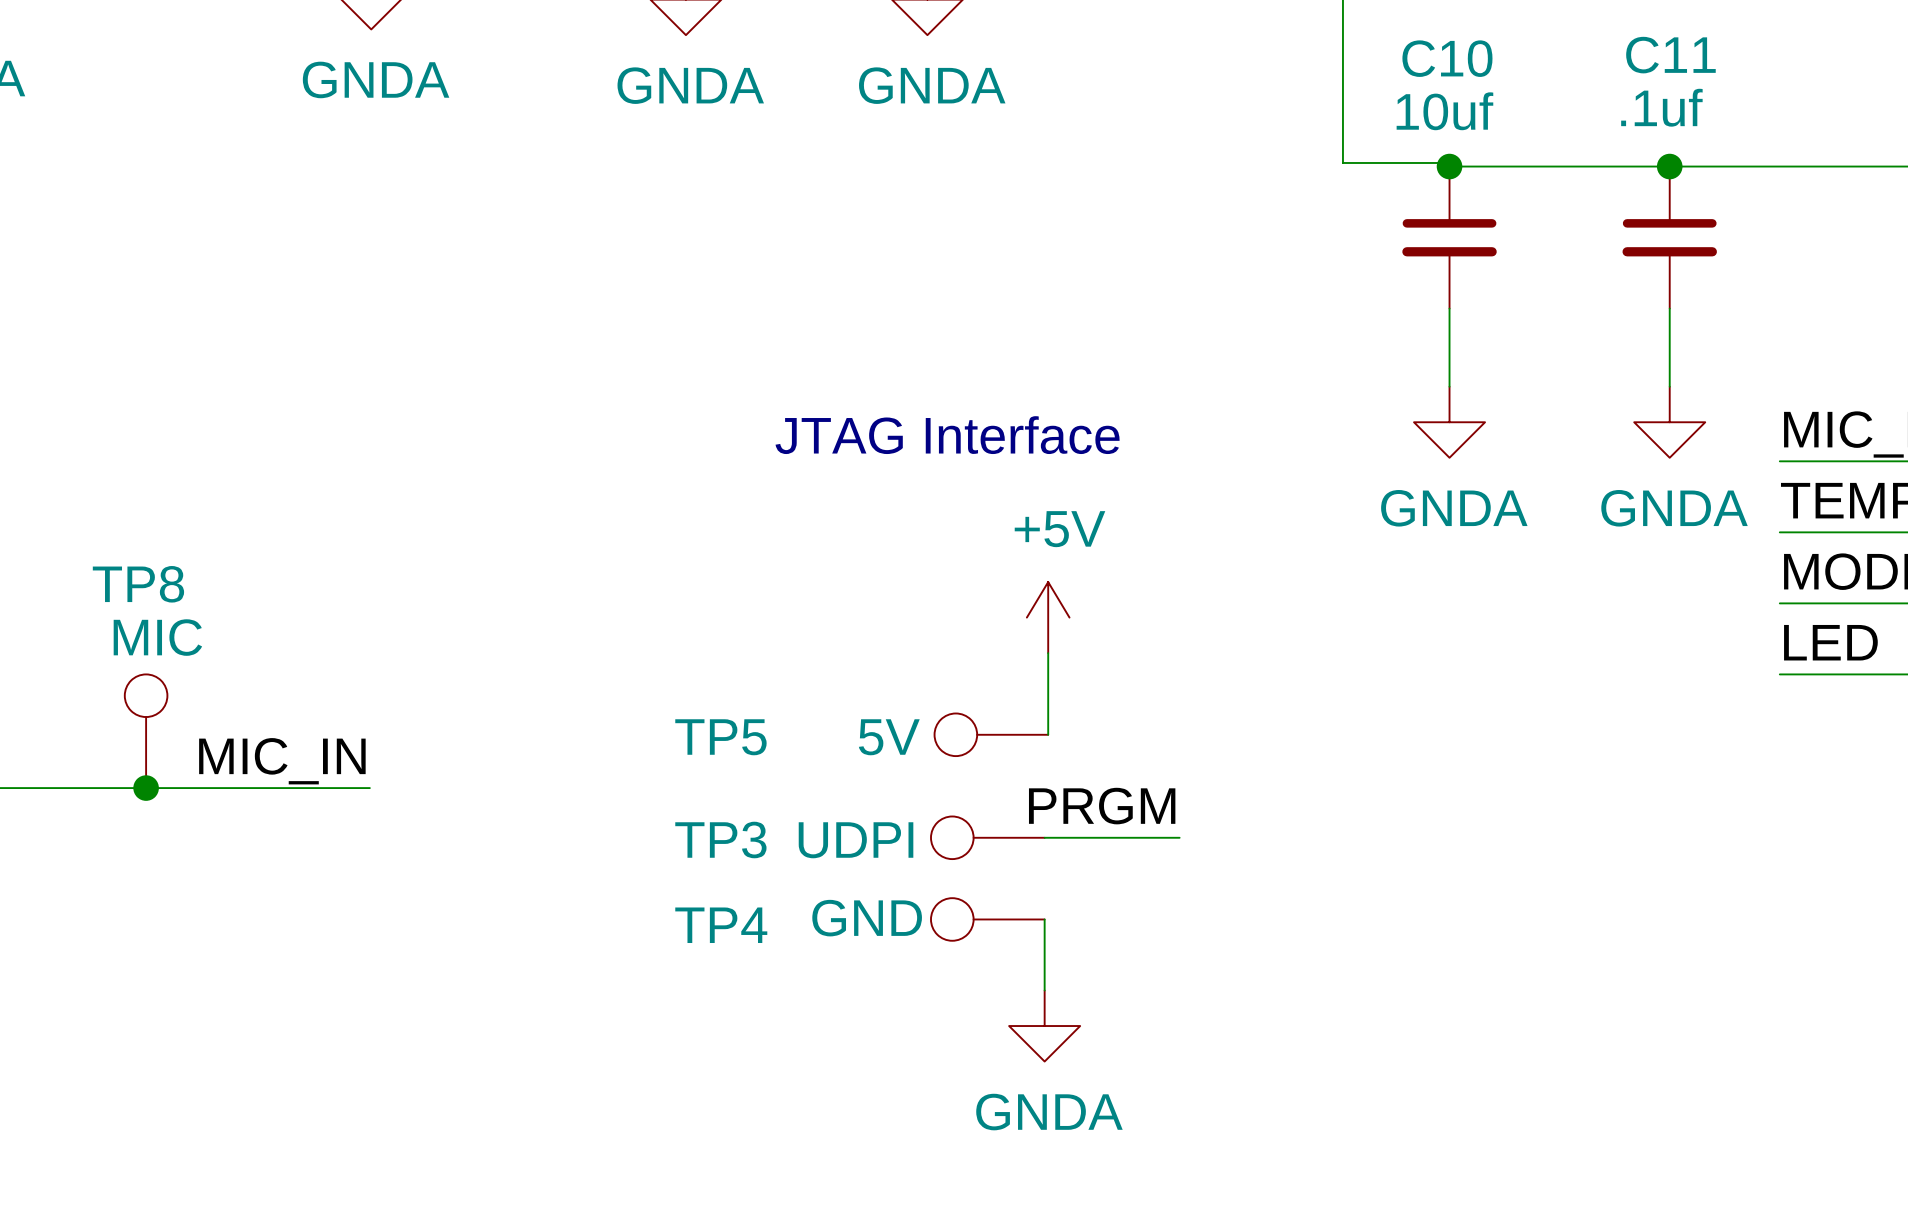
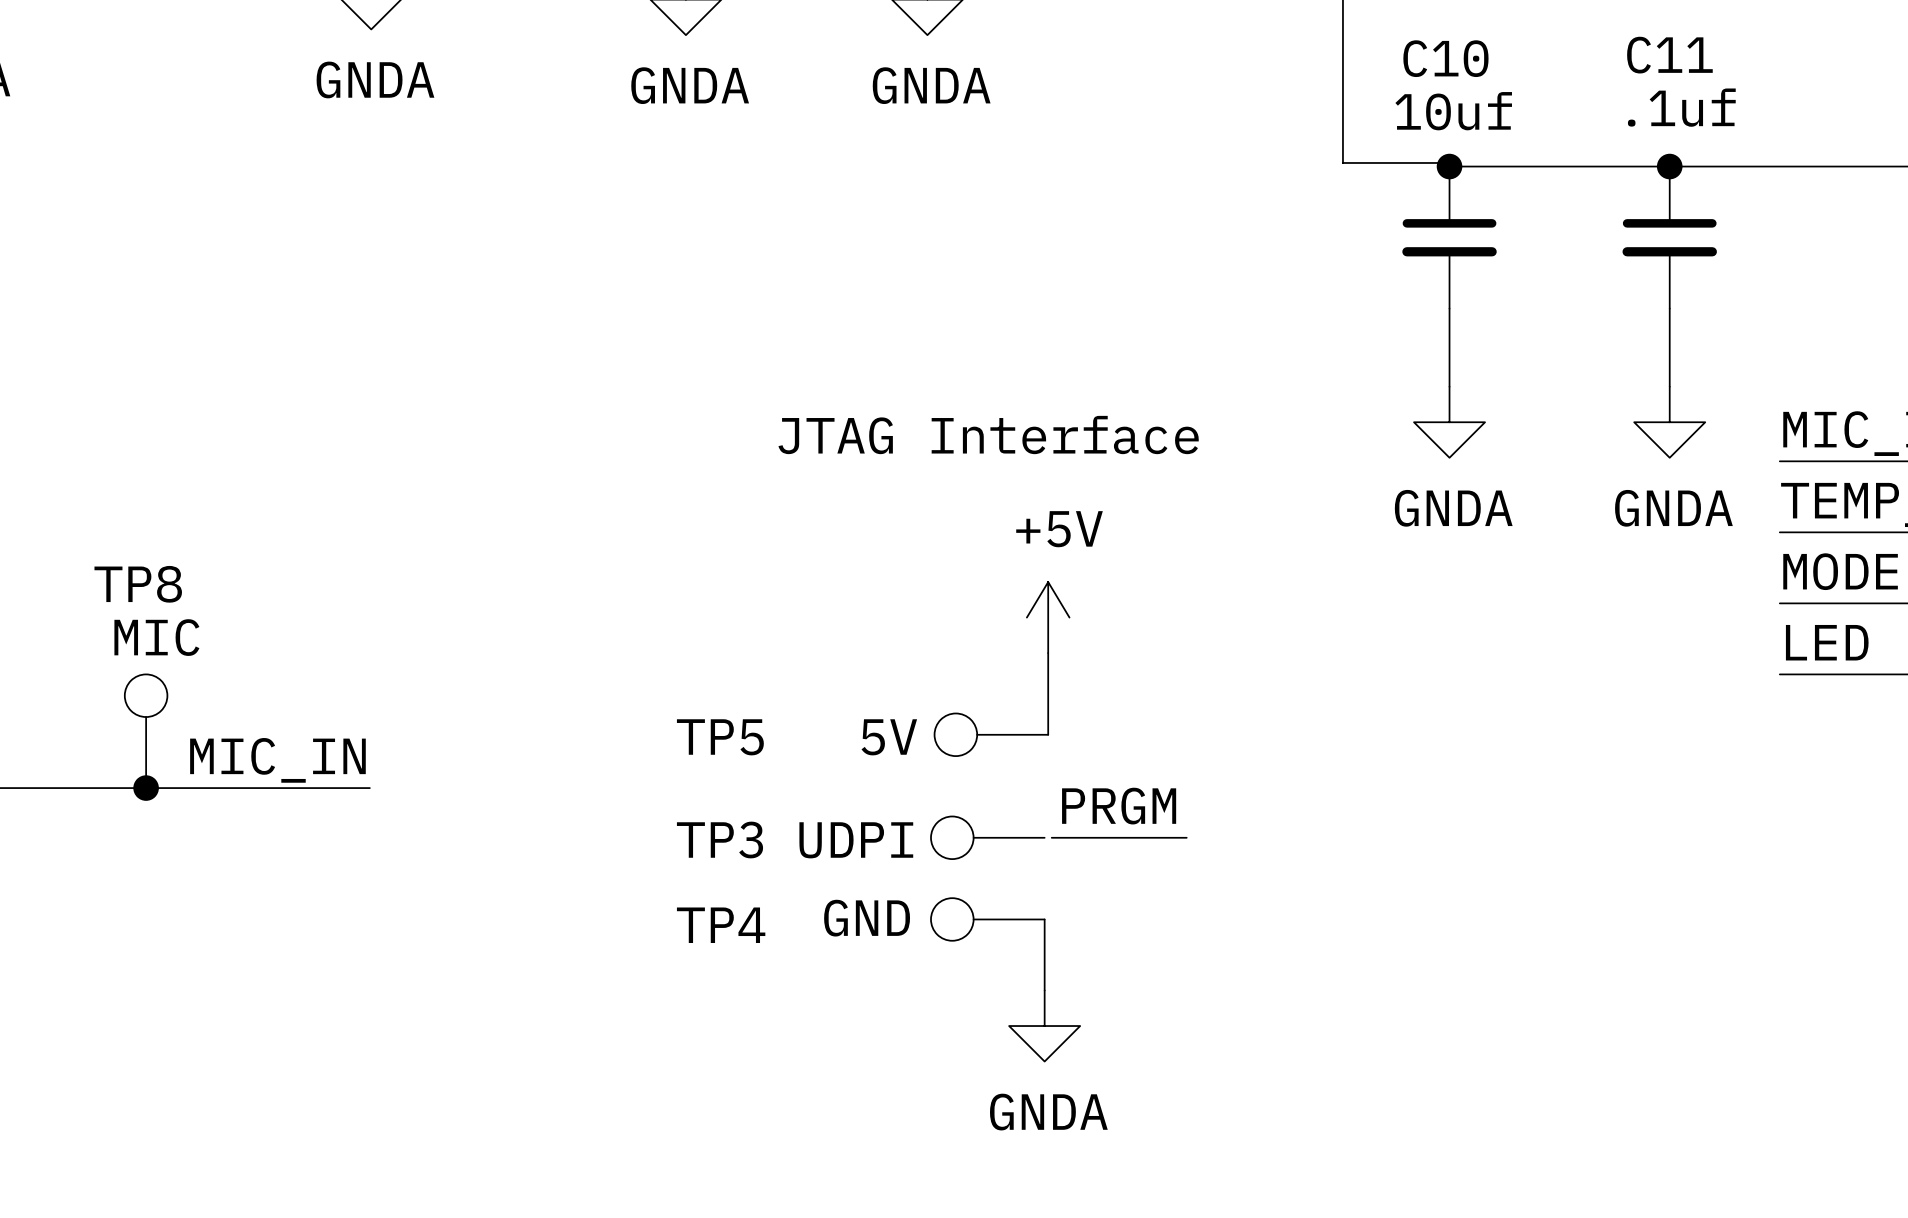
wire: (1044, 837) (1051, 837) -> (1179, 837) (1186, 837)

